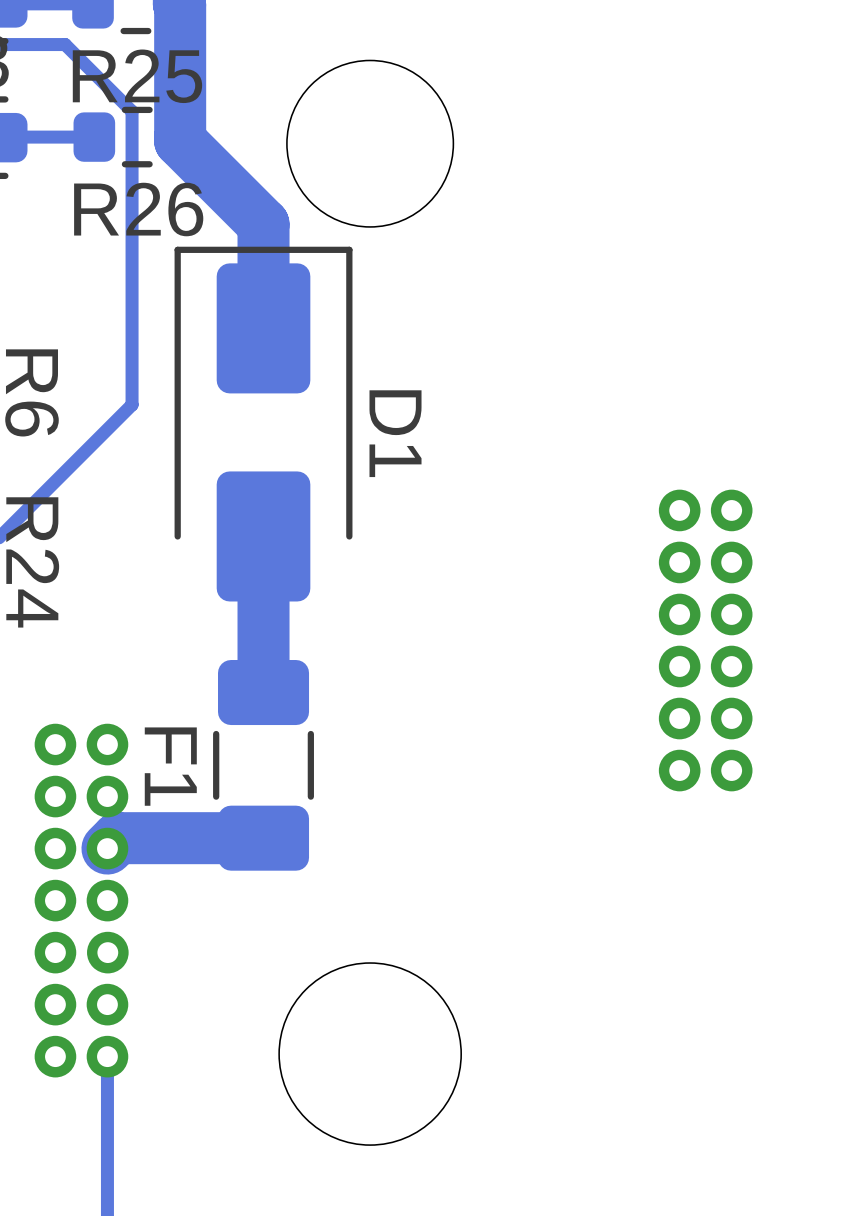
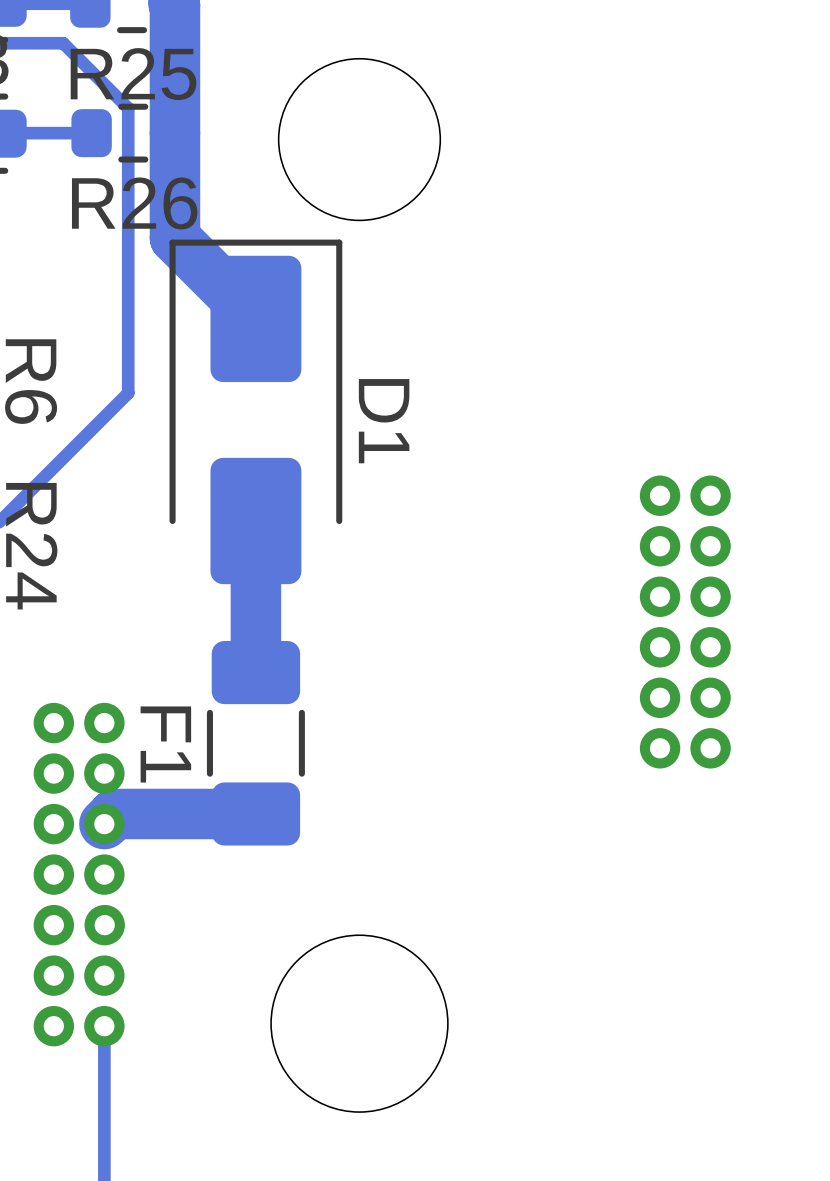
track: (180, 141) (263, 224) (263, 328) -> (174, 136) (174, 237) (255, 318)

